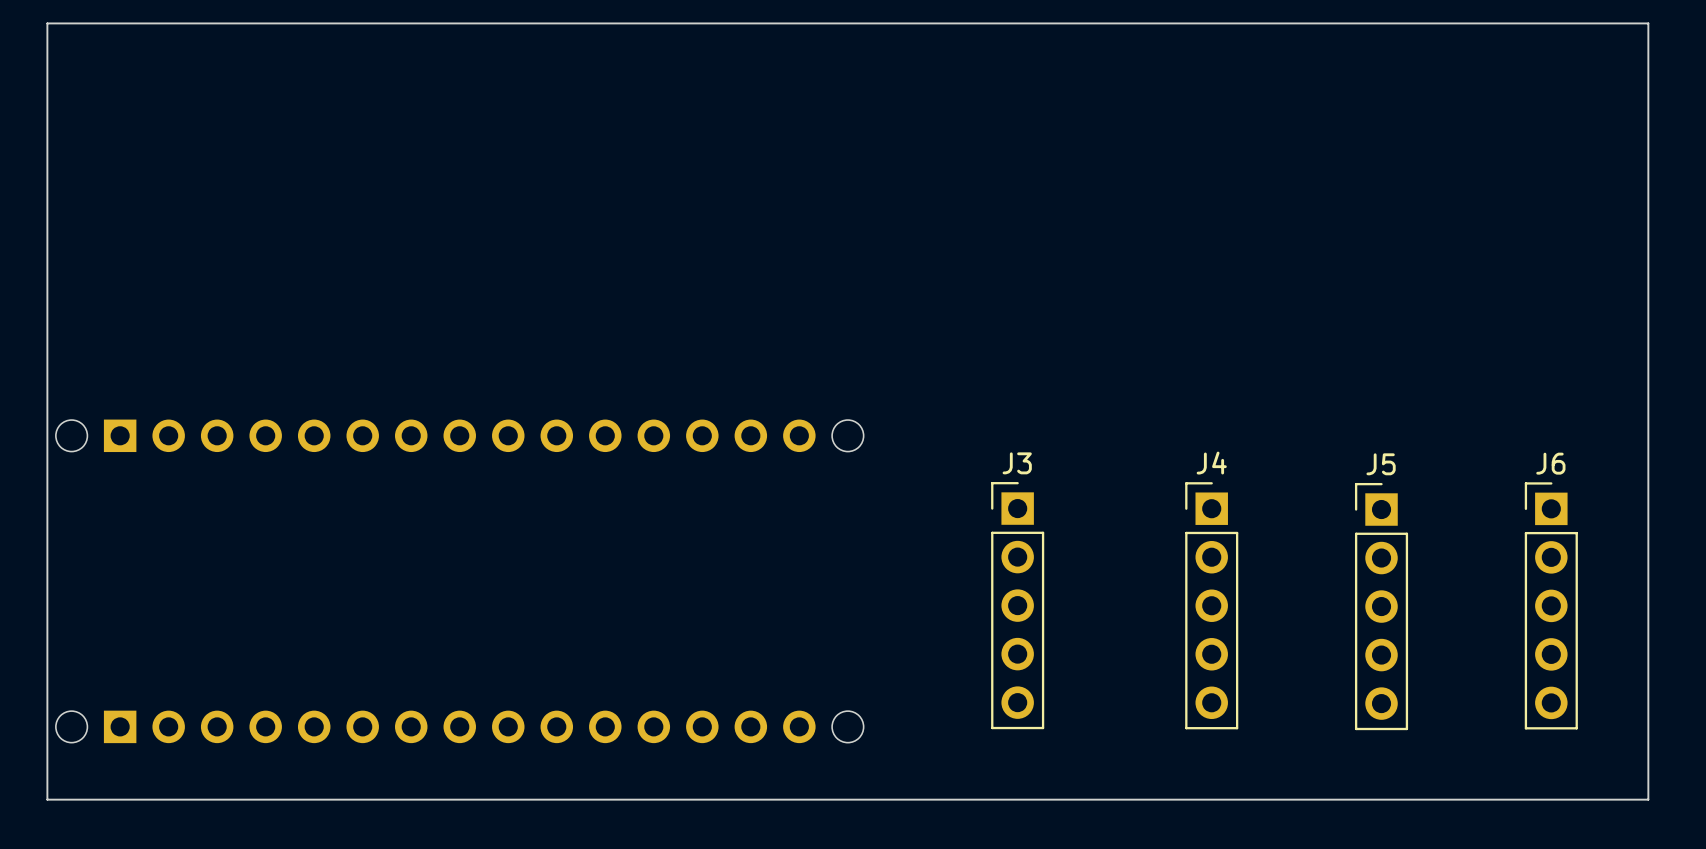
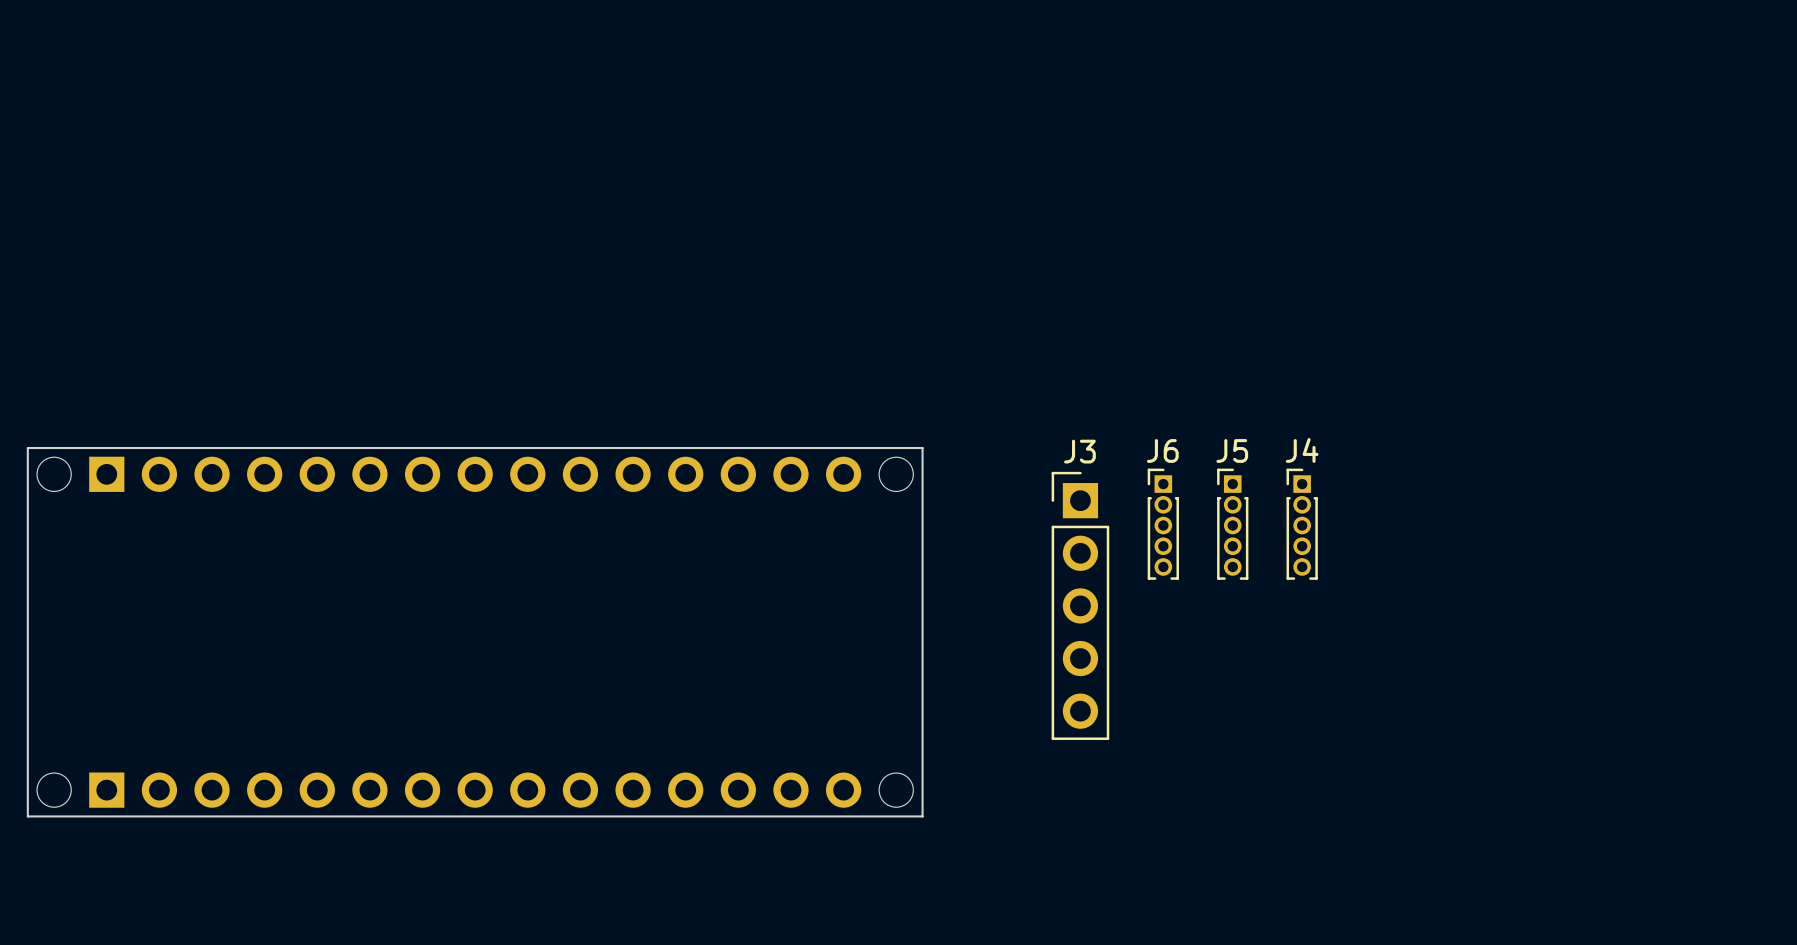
board edge: (47, 411) (47, 23) (1648, 23) (1648, 799) (47, 799) (47, 751) -> (27, 448) (922, 448) (922, 816) (27, 816)
J4 name position: J4 (1211, 463) -> J4 (1302, 450)
J6 name position: J6 (1550, 463) -> J6 (1162, 450)
J5 name position: J5 (1381, 464) -> J5 (1232, 450)
J4 footprint: [1185, 482, 1239, 730] -> [1286, 468, 1318, 580]
J5 footprint: [1354, 482, 1409, 731] -> [1217, 468, 1249, 580]
J6 footprint: [1524, 482, 1578, 730] -> [1147, 468, 1179, 580]
J3 position: (1017, 605) -> (1080, 605)

